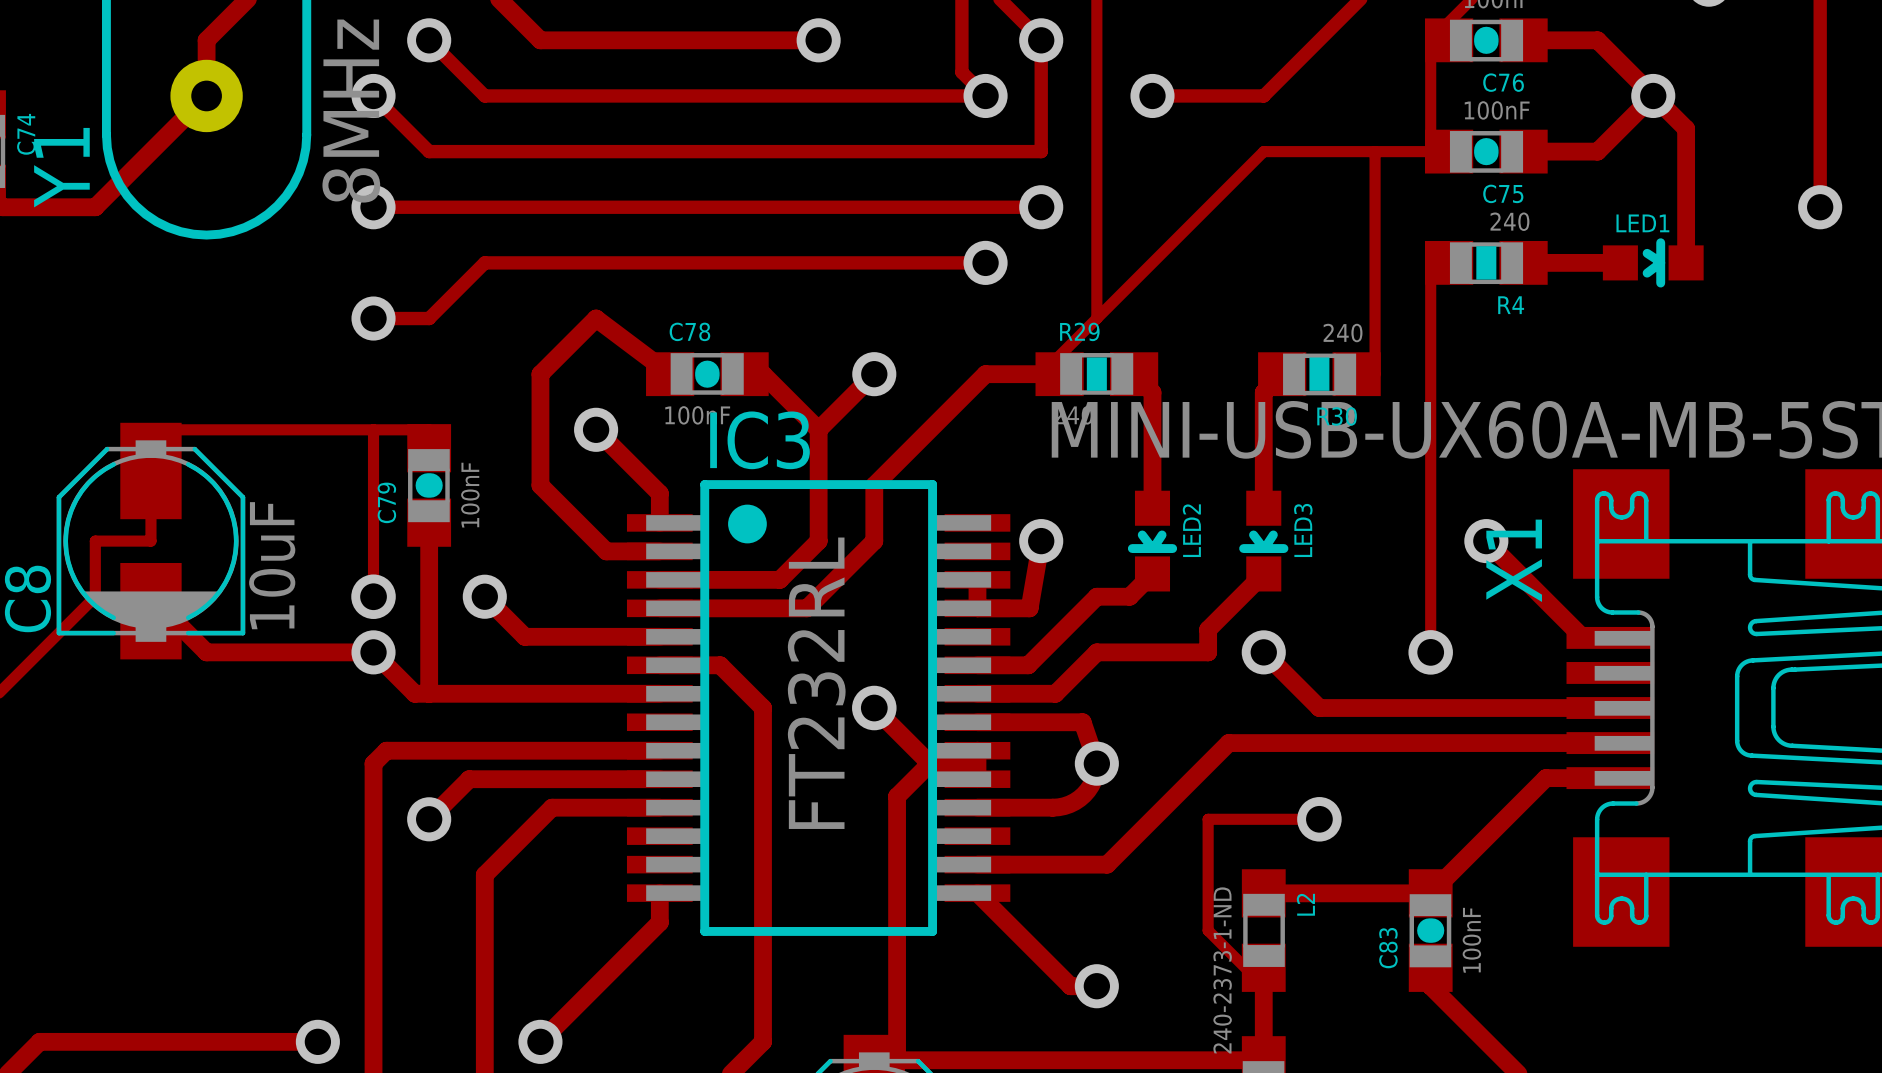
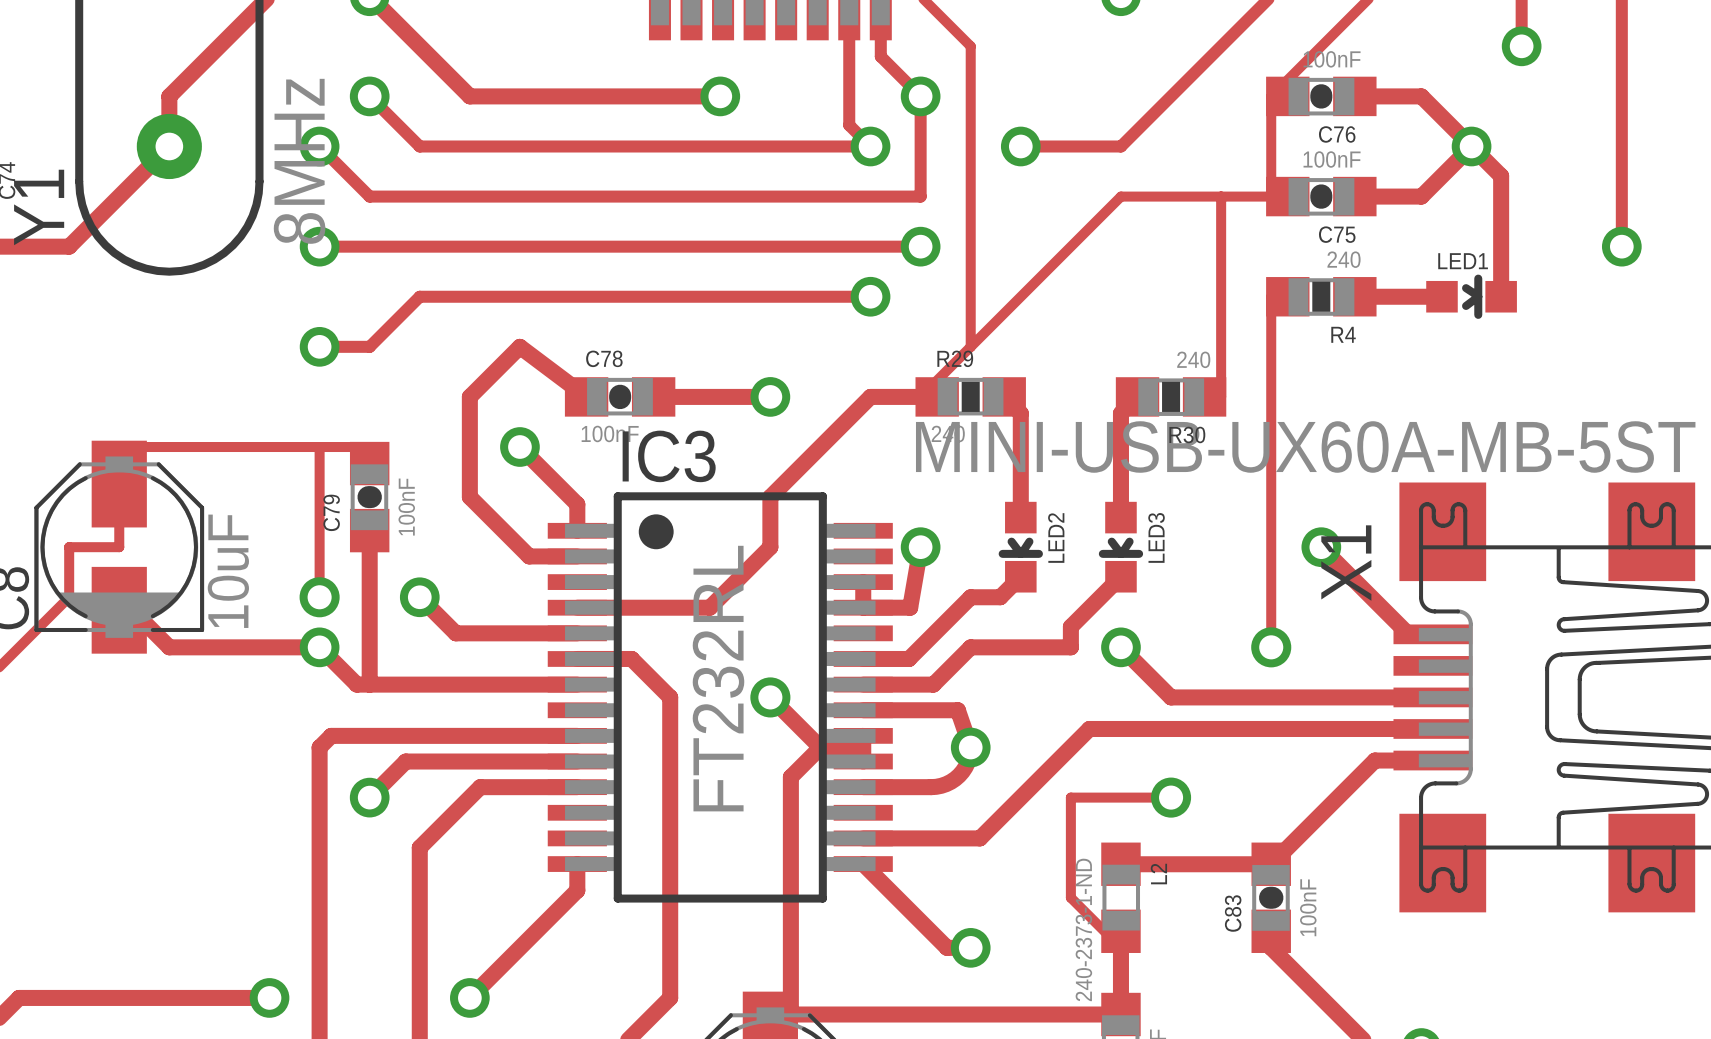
track: (763, 374) (818, 429) -> (670, 396) (770, 396)
track: (874, 374) (818, 429) -> none
track: (818, 429) (818, 541) (779, 579) (659, 579) -> none

